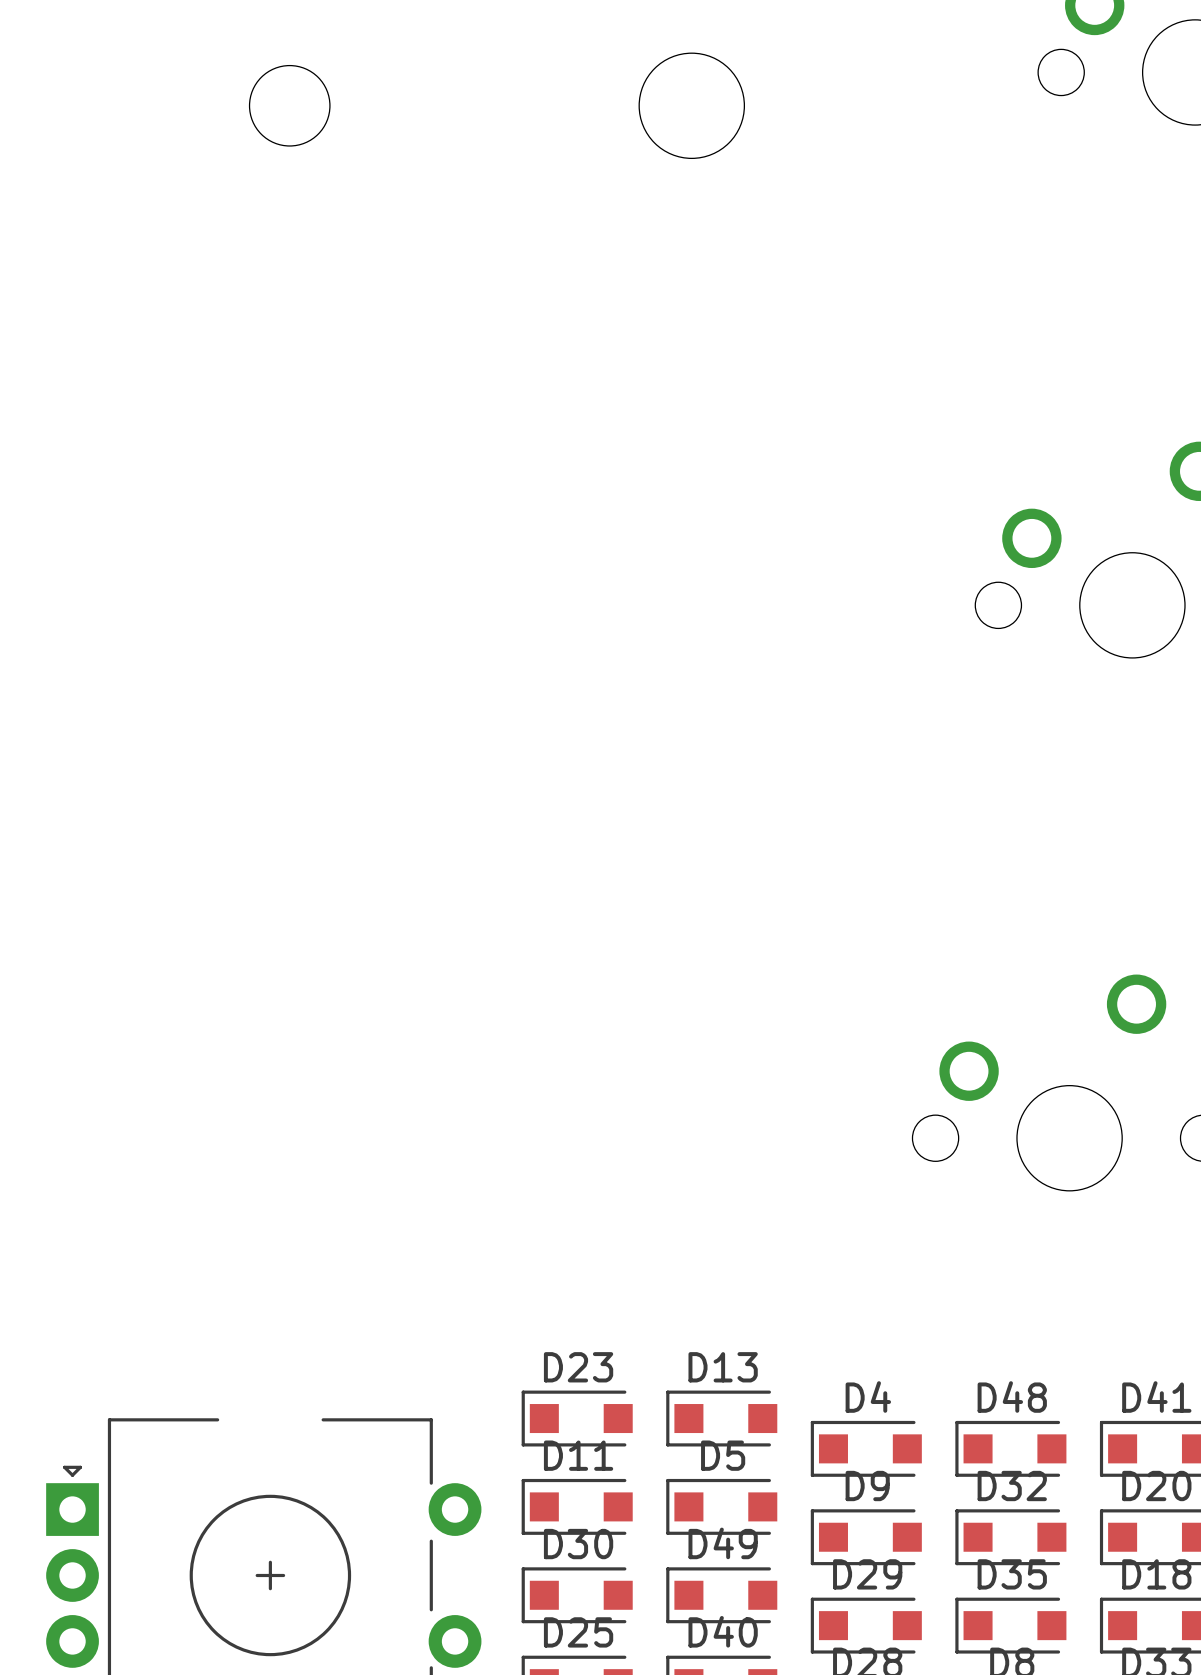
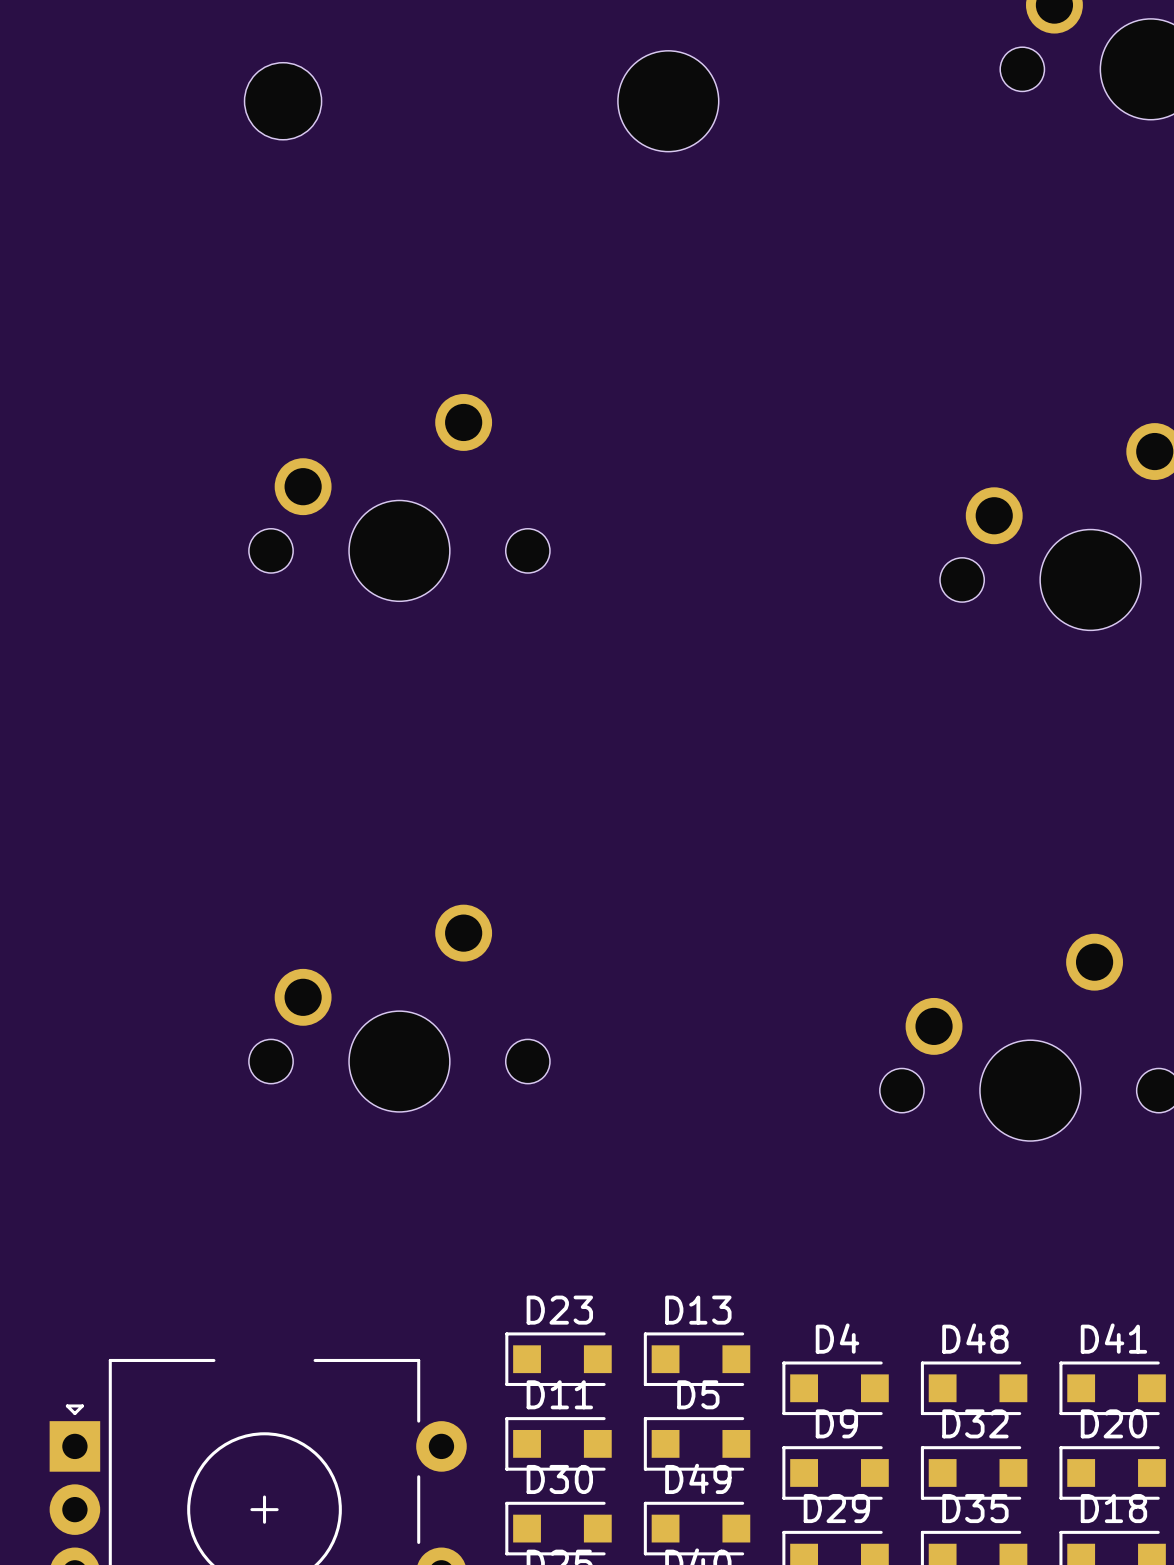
part: none -> (399, 497)
part: none -> (399, 1008)

